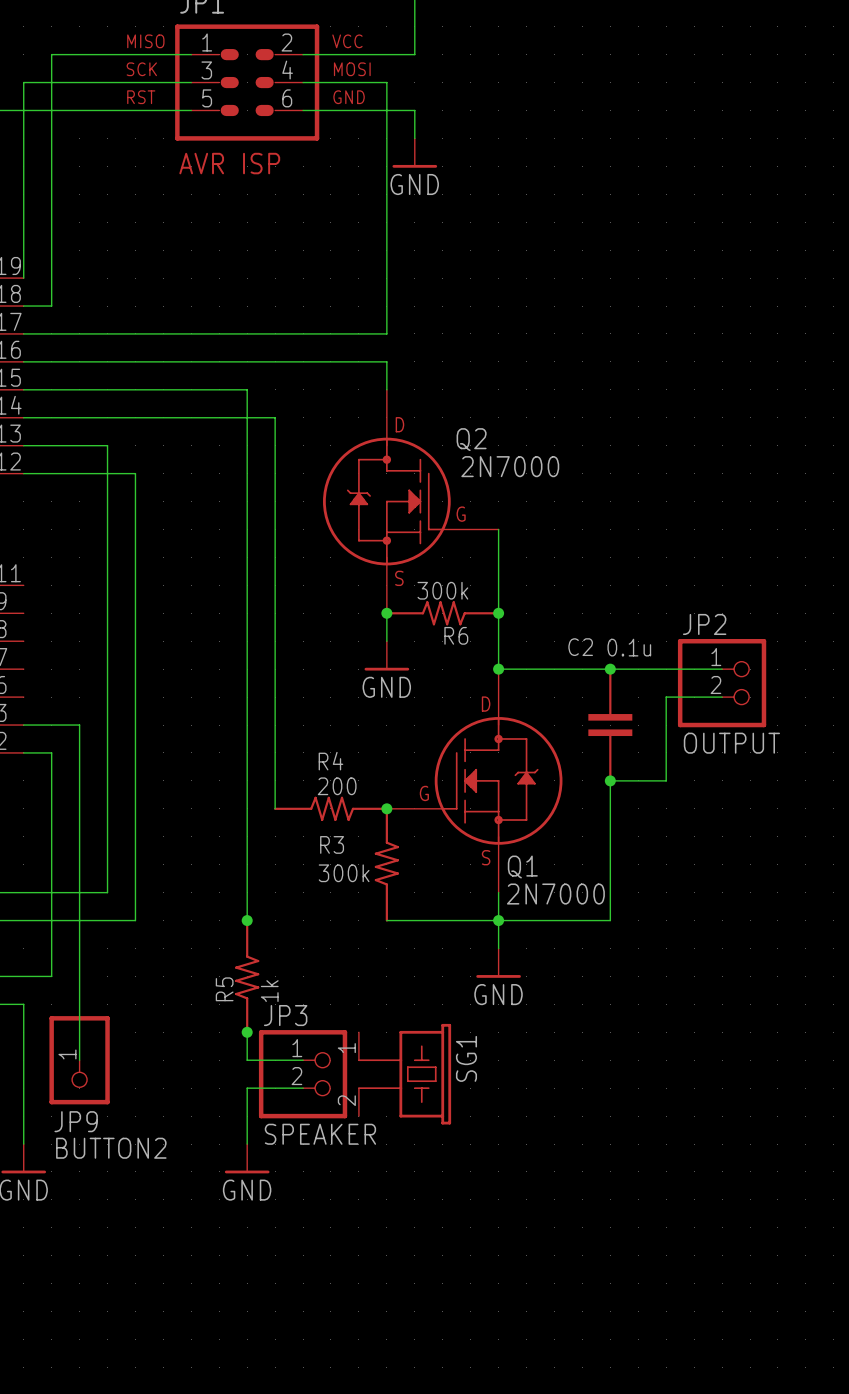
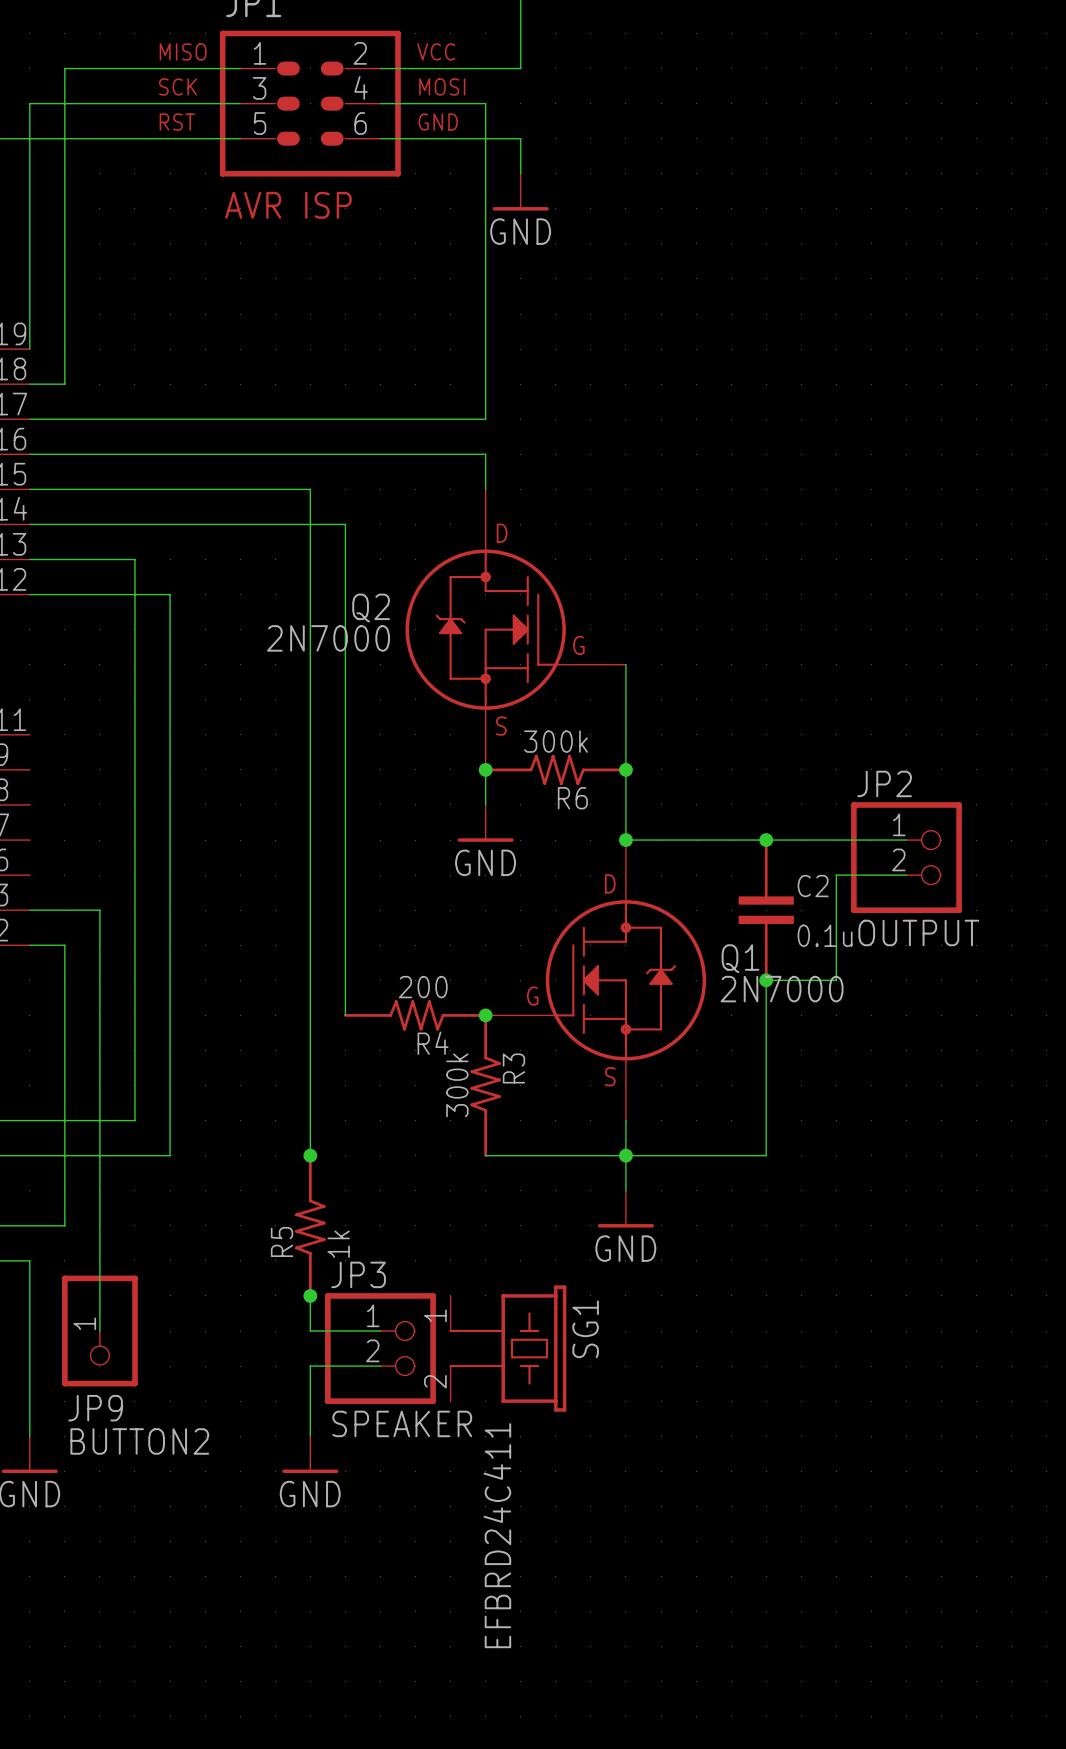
Q2 name position: Q2 (471, 439) -> Q2 (371, 608)
Q2 value position: 2N7000 (510, 466) -> 2N7000 (328, 638)
C2 name position: C2 (580, 647) -> C2 (813, 886)
C2 value position: 0.1u (629, 647) -> 0.1u (825, 935)
R4 name position: R4 (330, 761) -> R4 (433, 1043)
R3 name rotation: 0° (332, 844) -> 90° counterclockwise (513, 1068)
R3 name position: R3 (332, 844) -> R3 (513, 1068)
Q1 name position: Q1 (522, 867) -> Q1 (740, 958)
R3 value rotation: 0° (344, 873) -> 90° counterclockwise (457, 1085)
Q1 value position: 2N7000 (555, 894) -> 2N7000 (782, 989)
SG1 value: none -> EFBRD24C411 (497, 1535)

